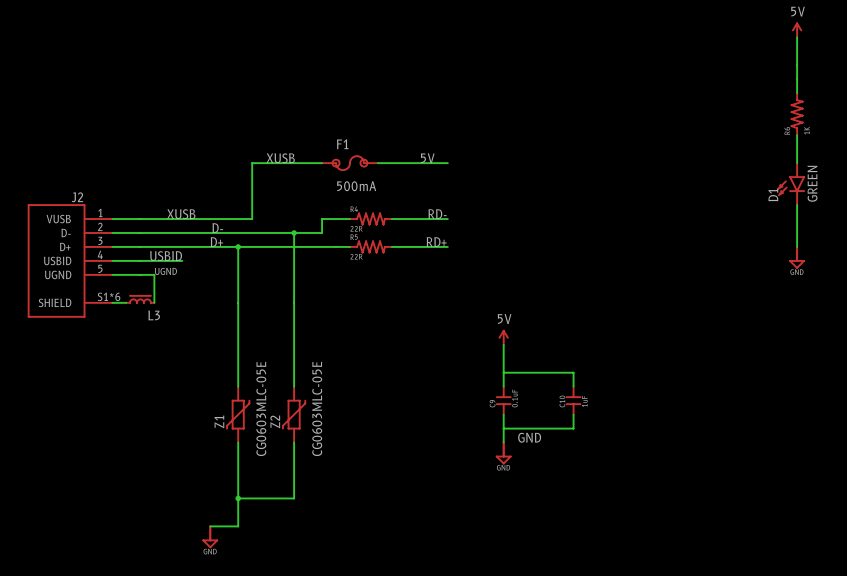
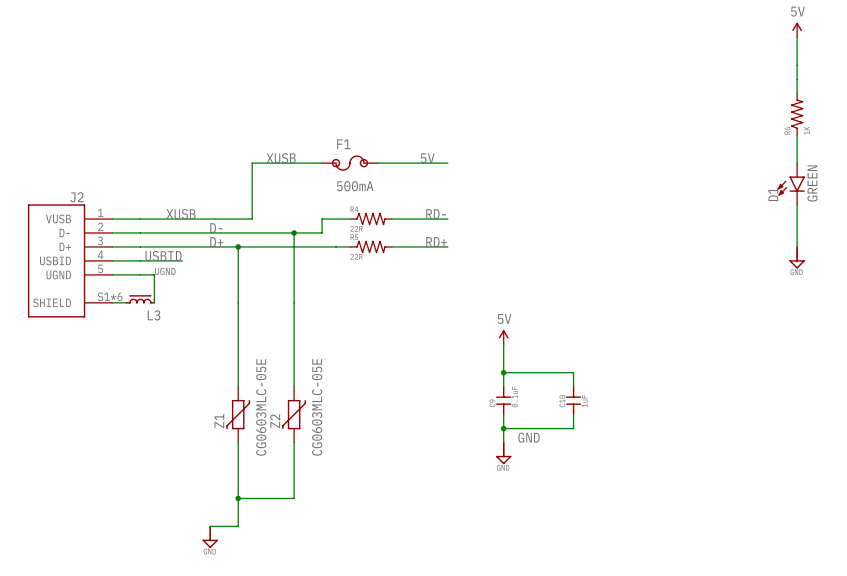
junction: none -> (503, 372)
junction: none -> (503, 428)

